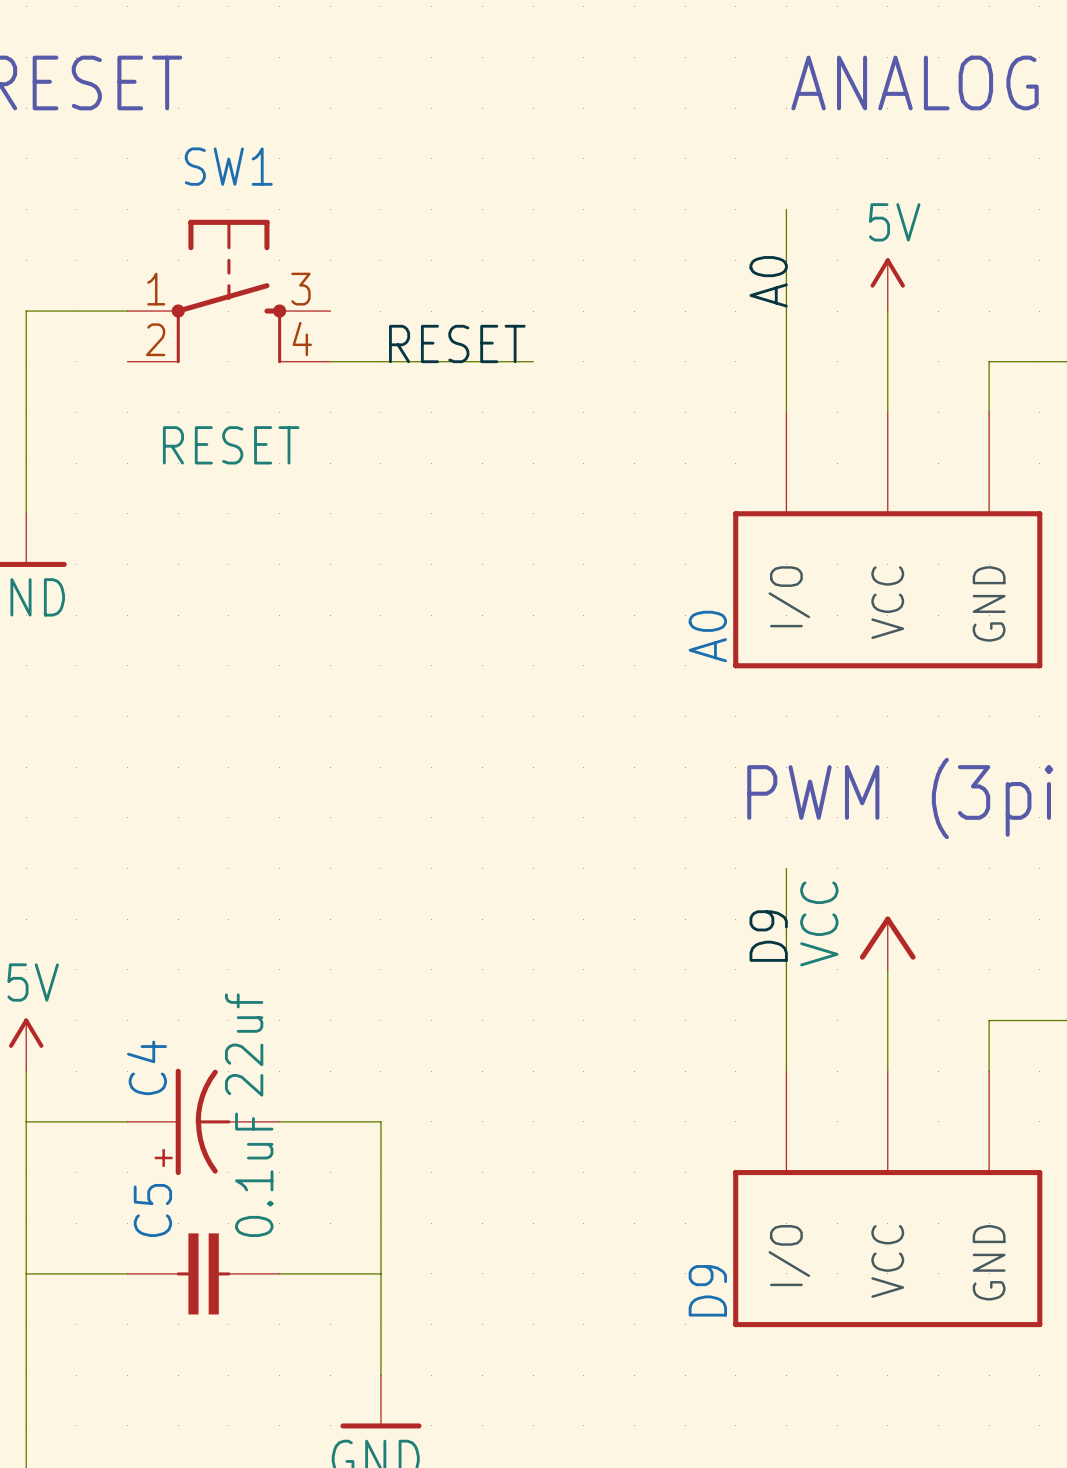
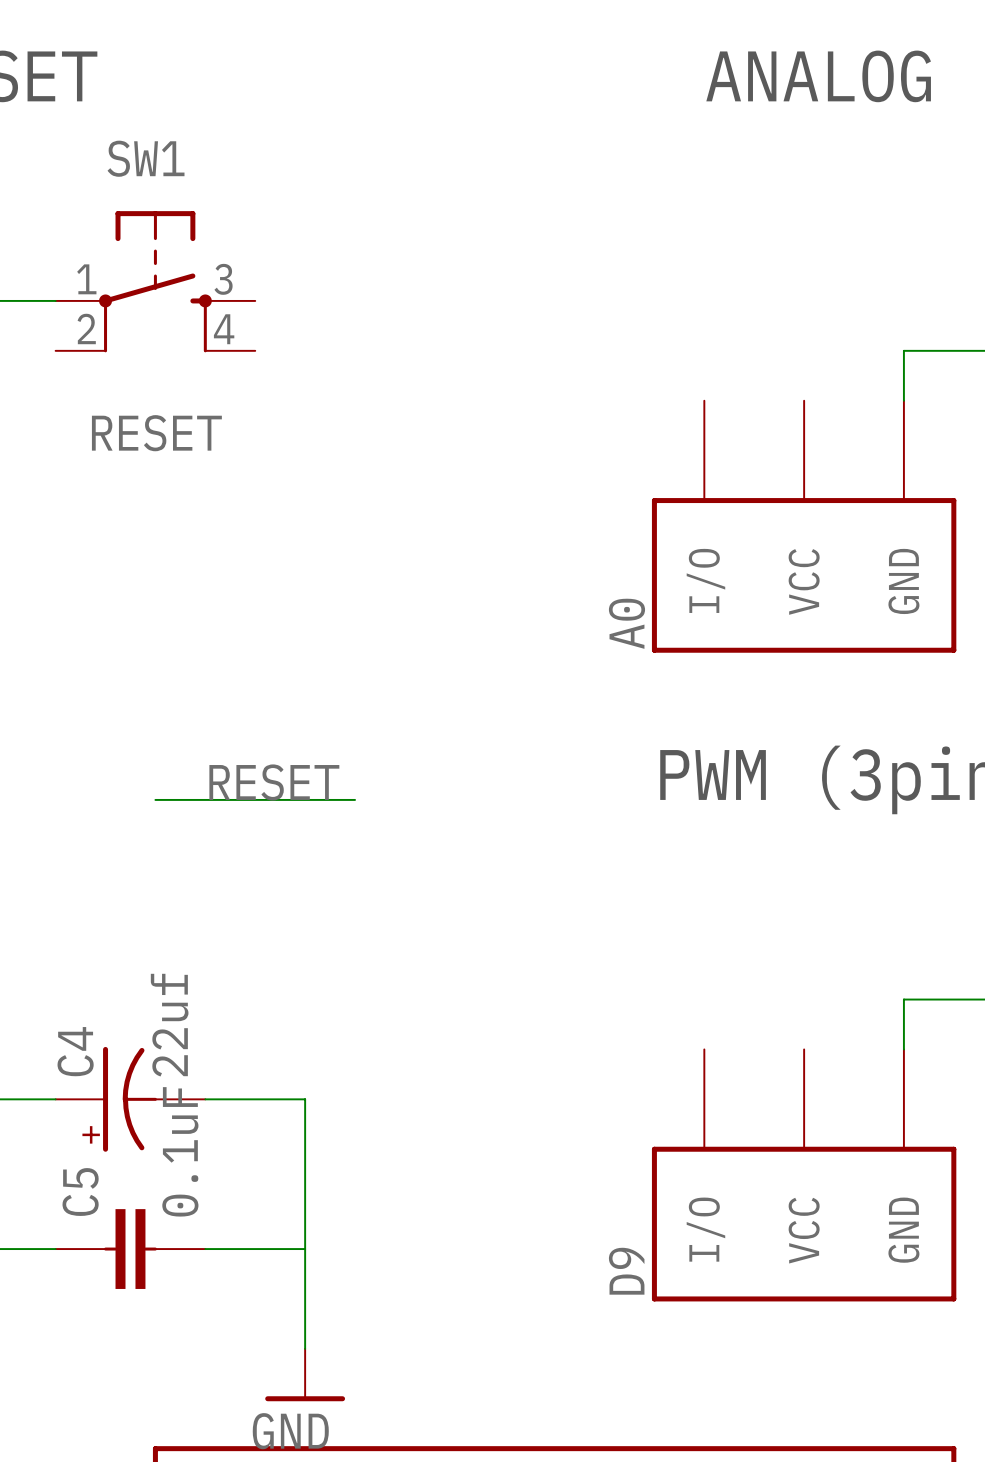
wire: (786, 209) (786, 412) -> none
label: A0 (768, 281) -> none
power symbol: 5V (887, 284) -> none
wire: (887, 311) (887, 412) -> none
label position: RESET (457, 343) -> RESET (274, 782)
wire: (330, 361) (533, 361) -> (155, 799) (355, 799)
wire: (786, 868) (786, 1071) -> none
label: D9 (768, 936) -> none
power symbol: VCC (887, 943) -> none
wire: (887, 969) (887, 1071) -> none

